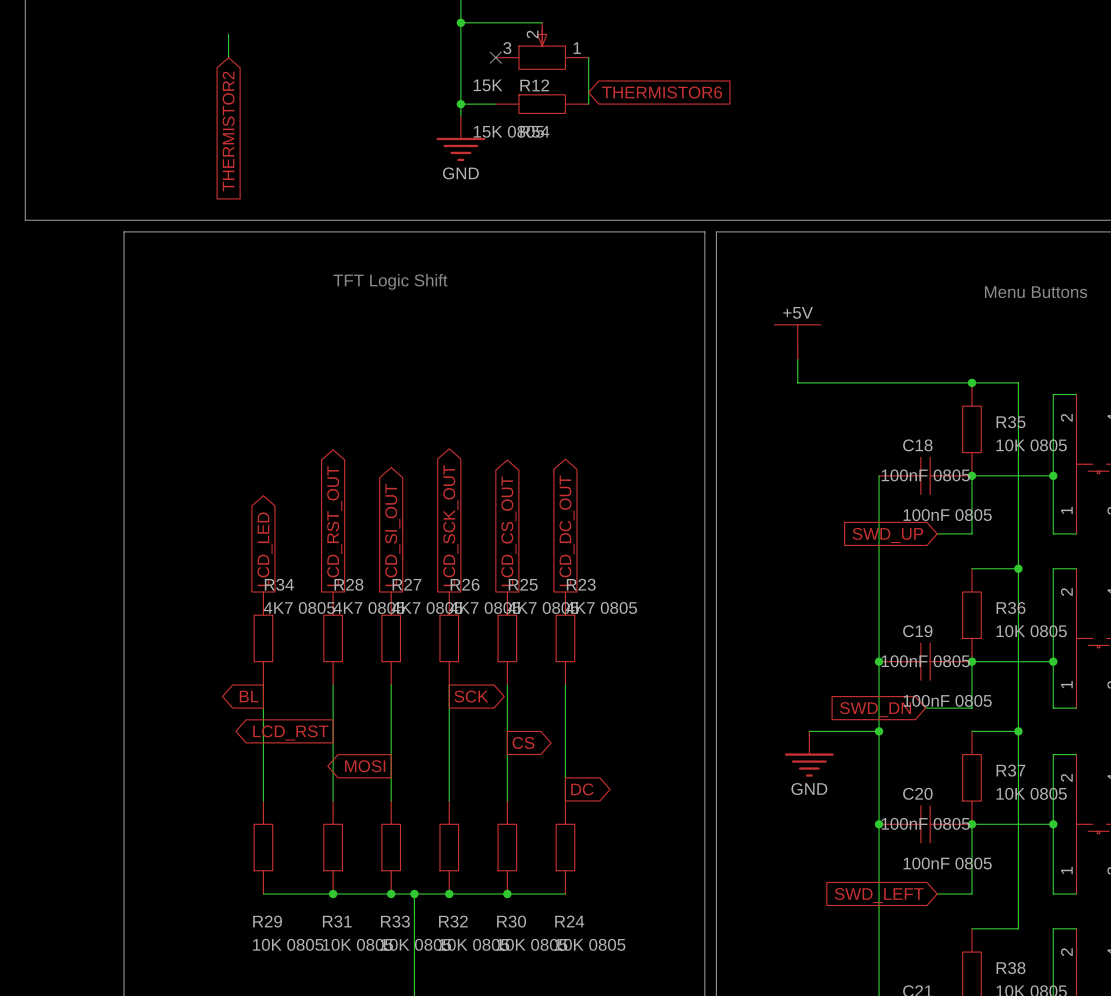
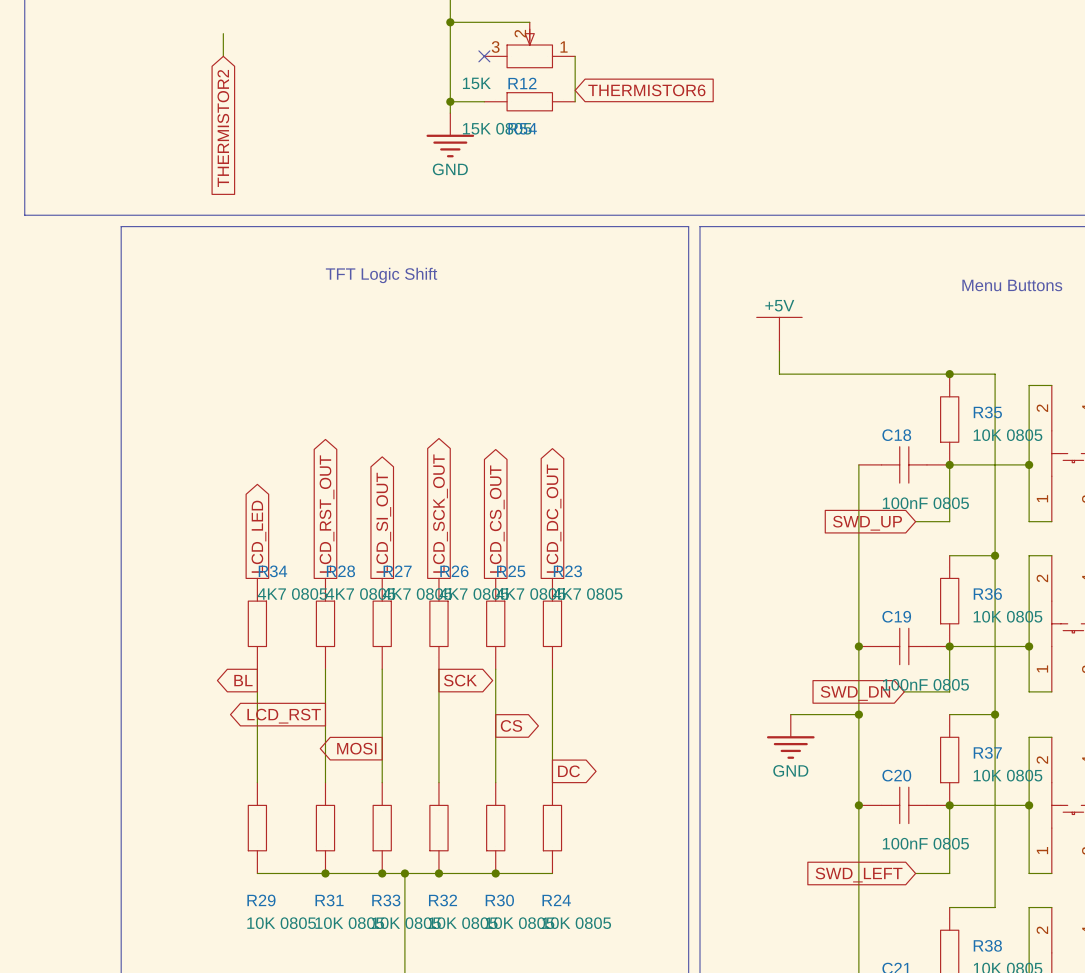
C18 text: 100nF 0805 (925, 475) -> none
C19 text: 100nF 0805 (925, 661) -> none
C20 text: 100nF 0805 (925, 823) -> none

